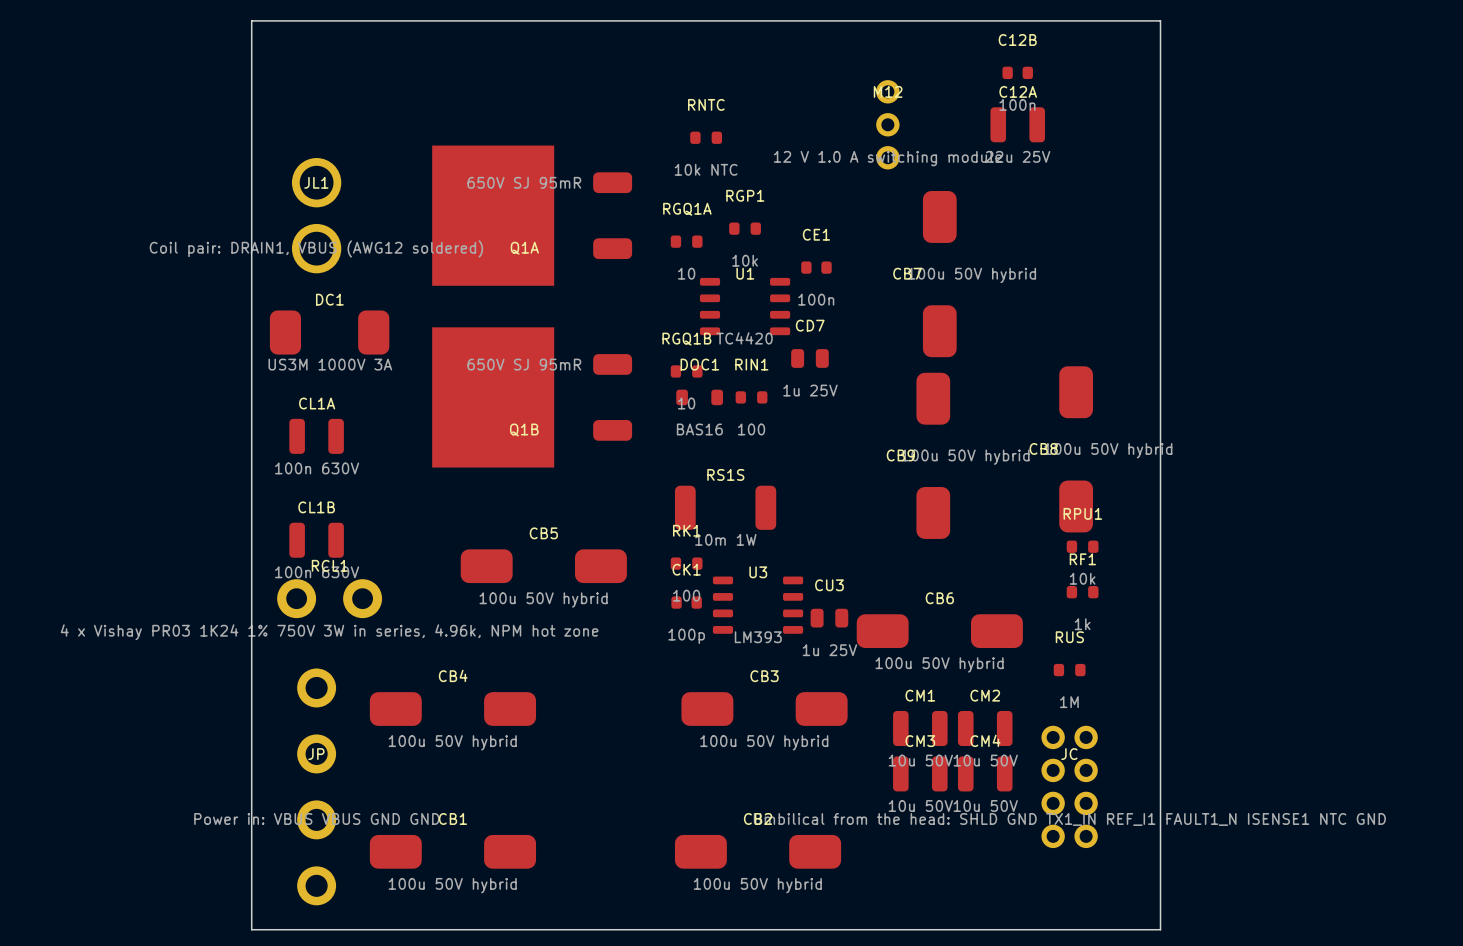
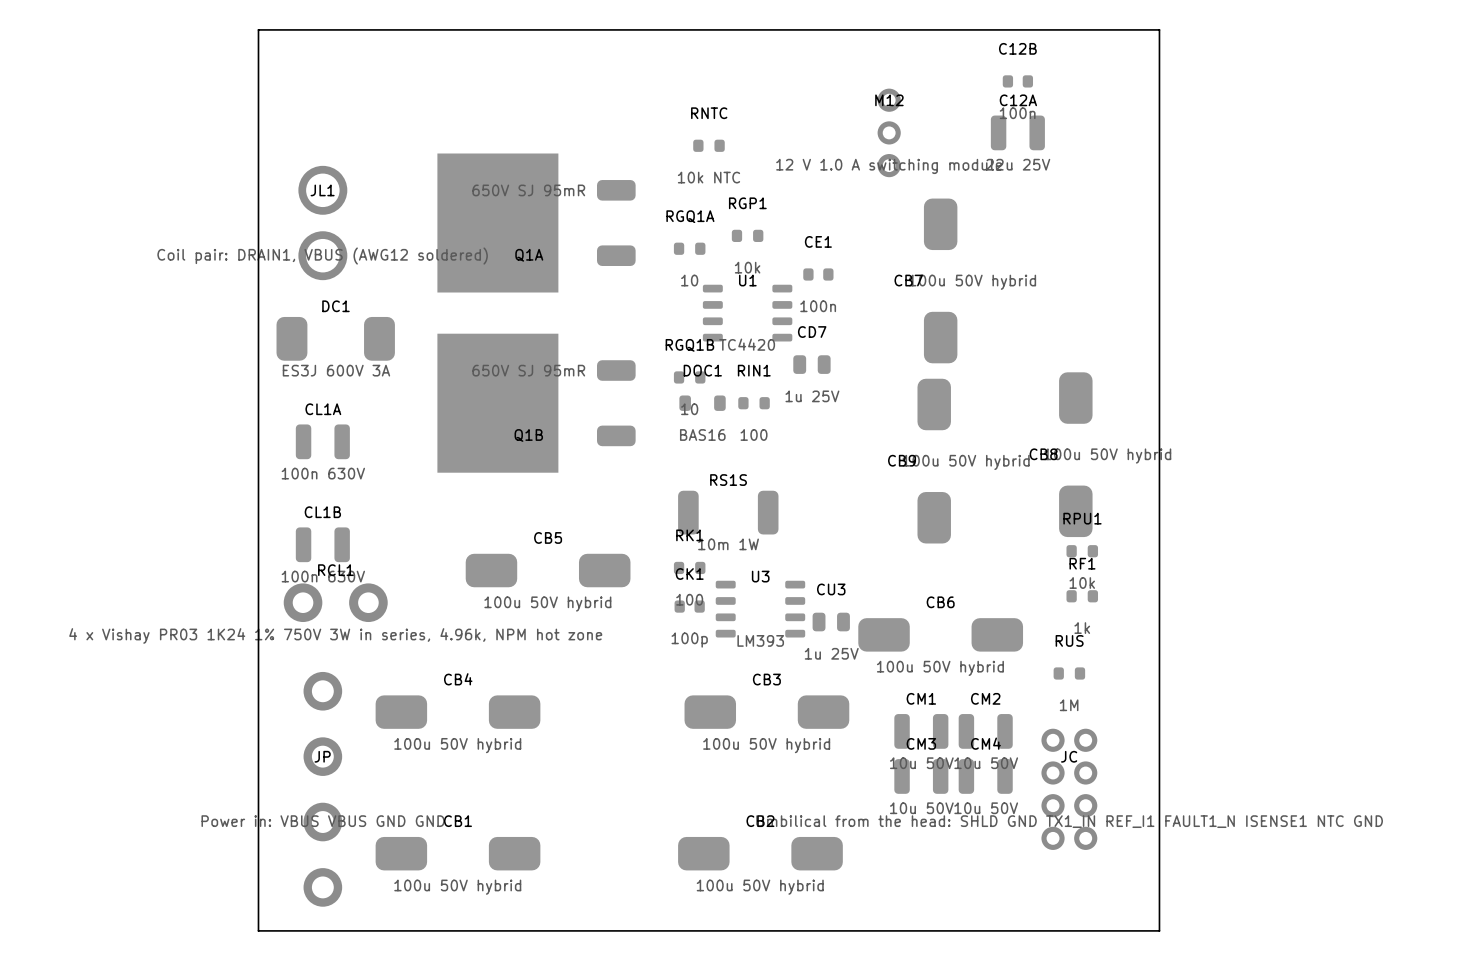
DC1 value: US3M 1000V 3A (330, 364) -> ES3J 600V 3A (336, 370)

